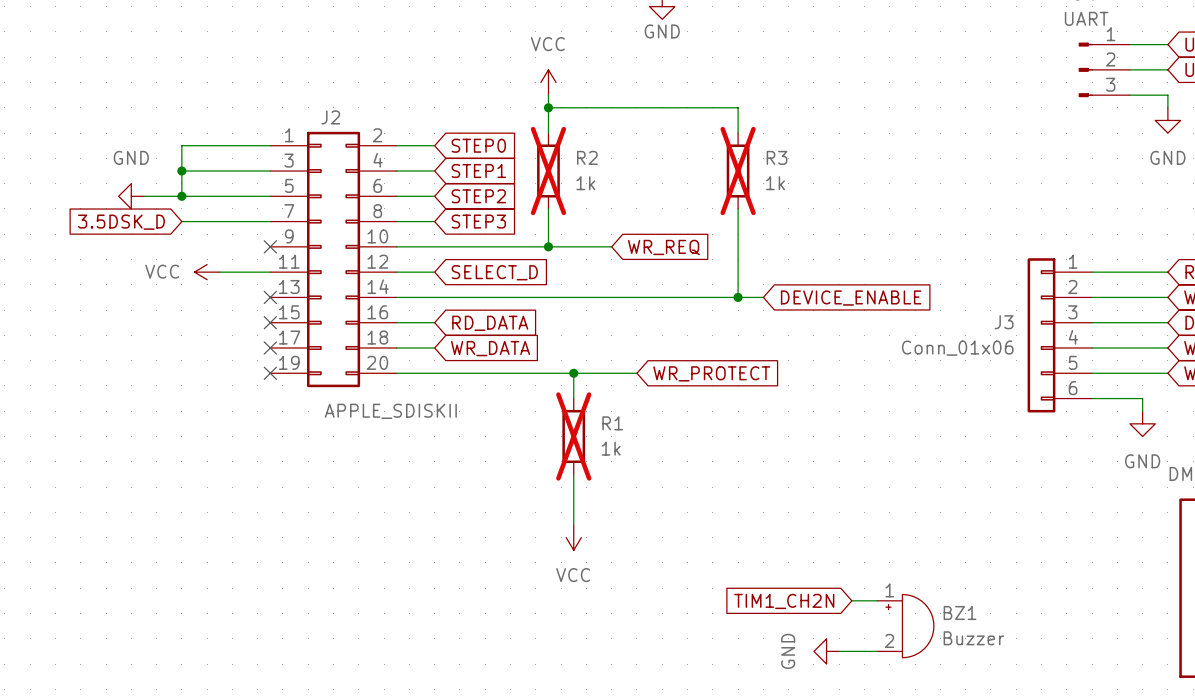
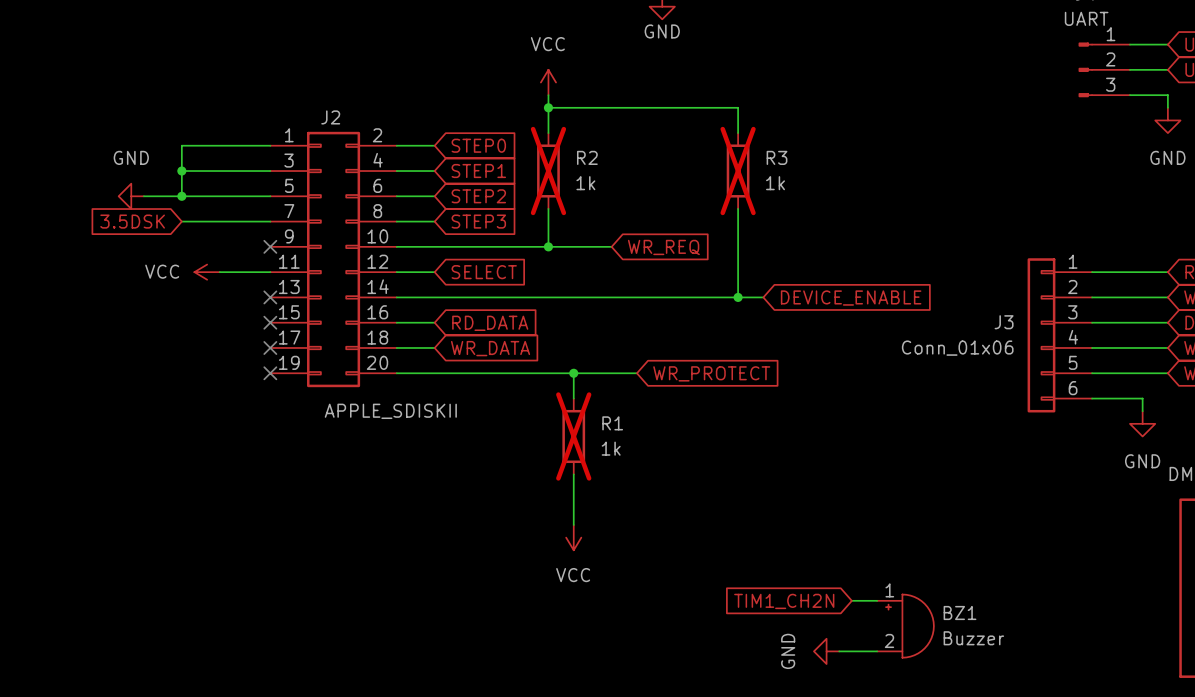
global label: 3.5DSK_D (121, 222) -> 3.5DSK (132, 221)
global label: SELECT_D (494, 272) -> SELECT (484, 272)

